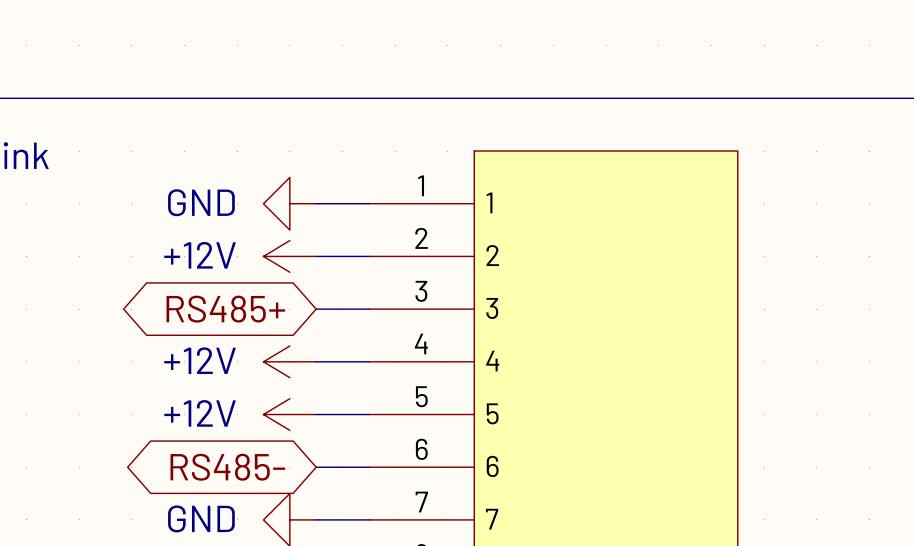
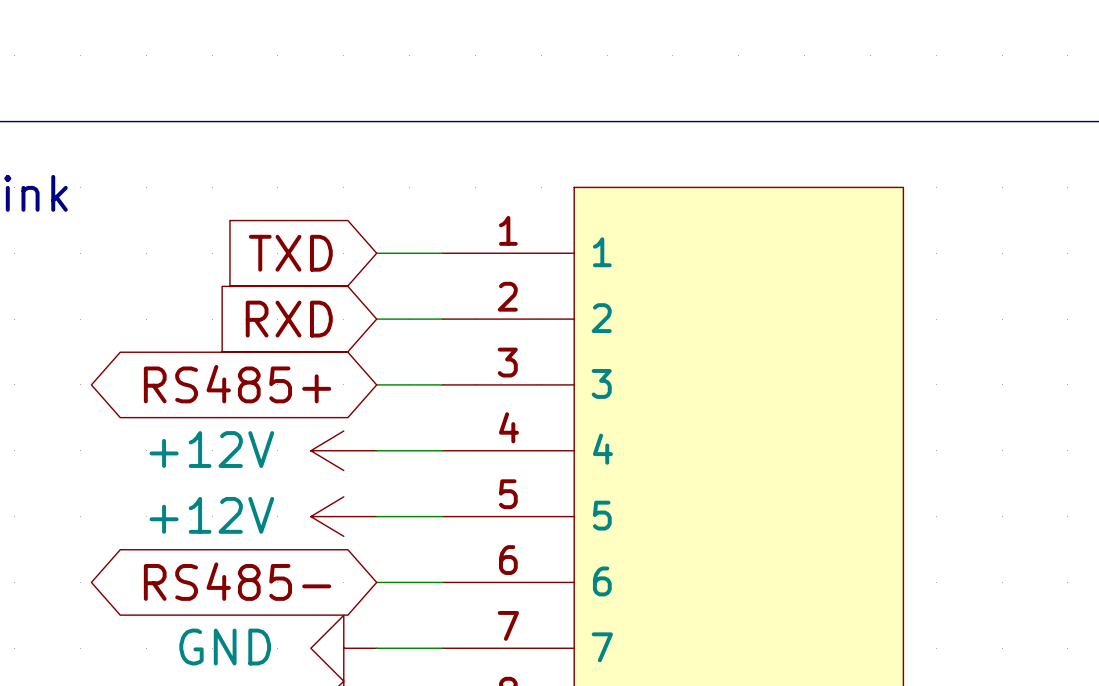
global label: none -> TXD (290, 253)
power symbol: GND (289, 203) -> none
global label: none -> RXD (289, 319)
power symbol: +12V (289, 256) -> none

